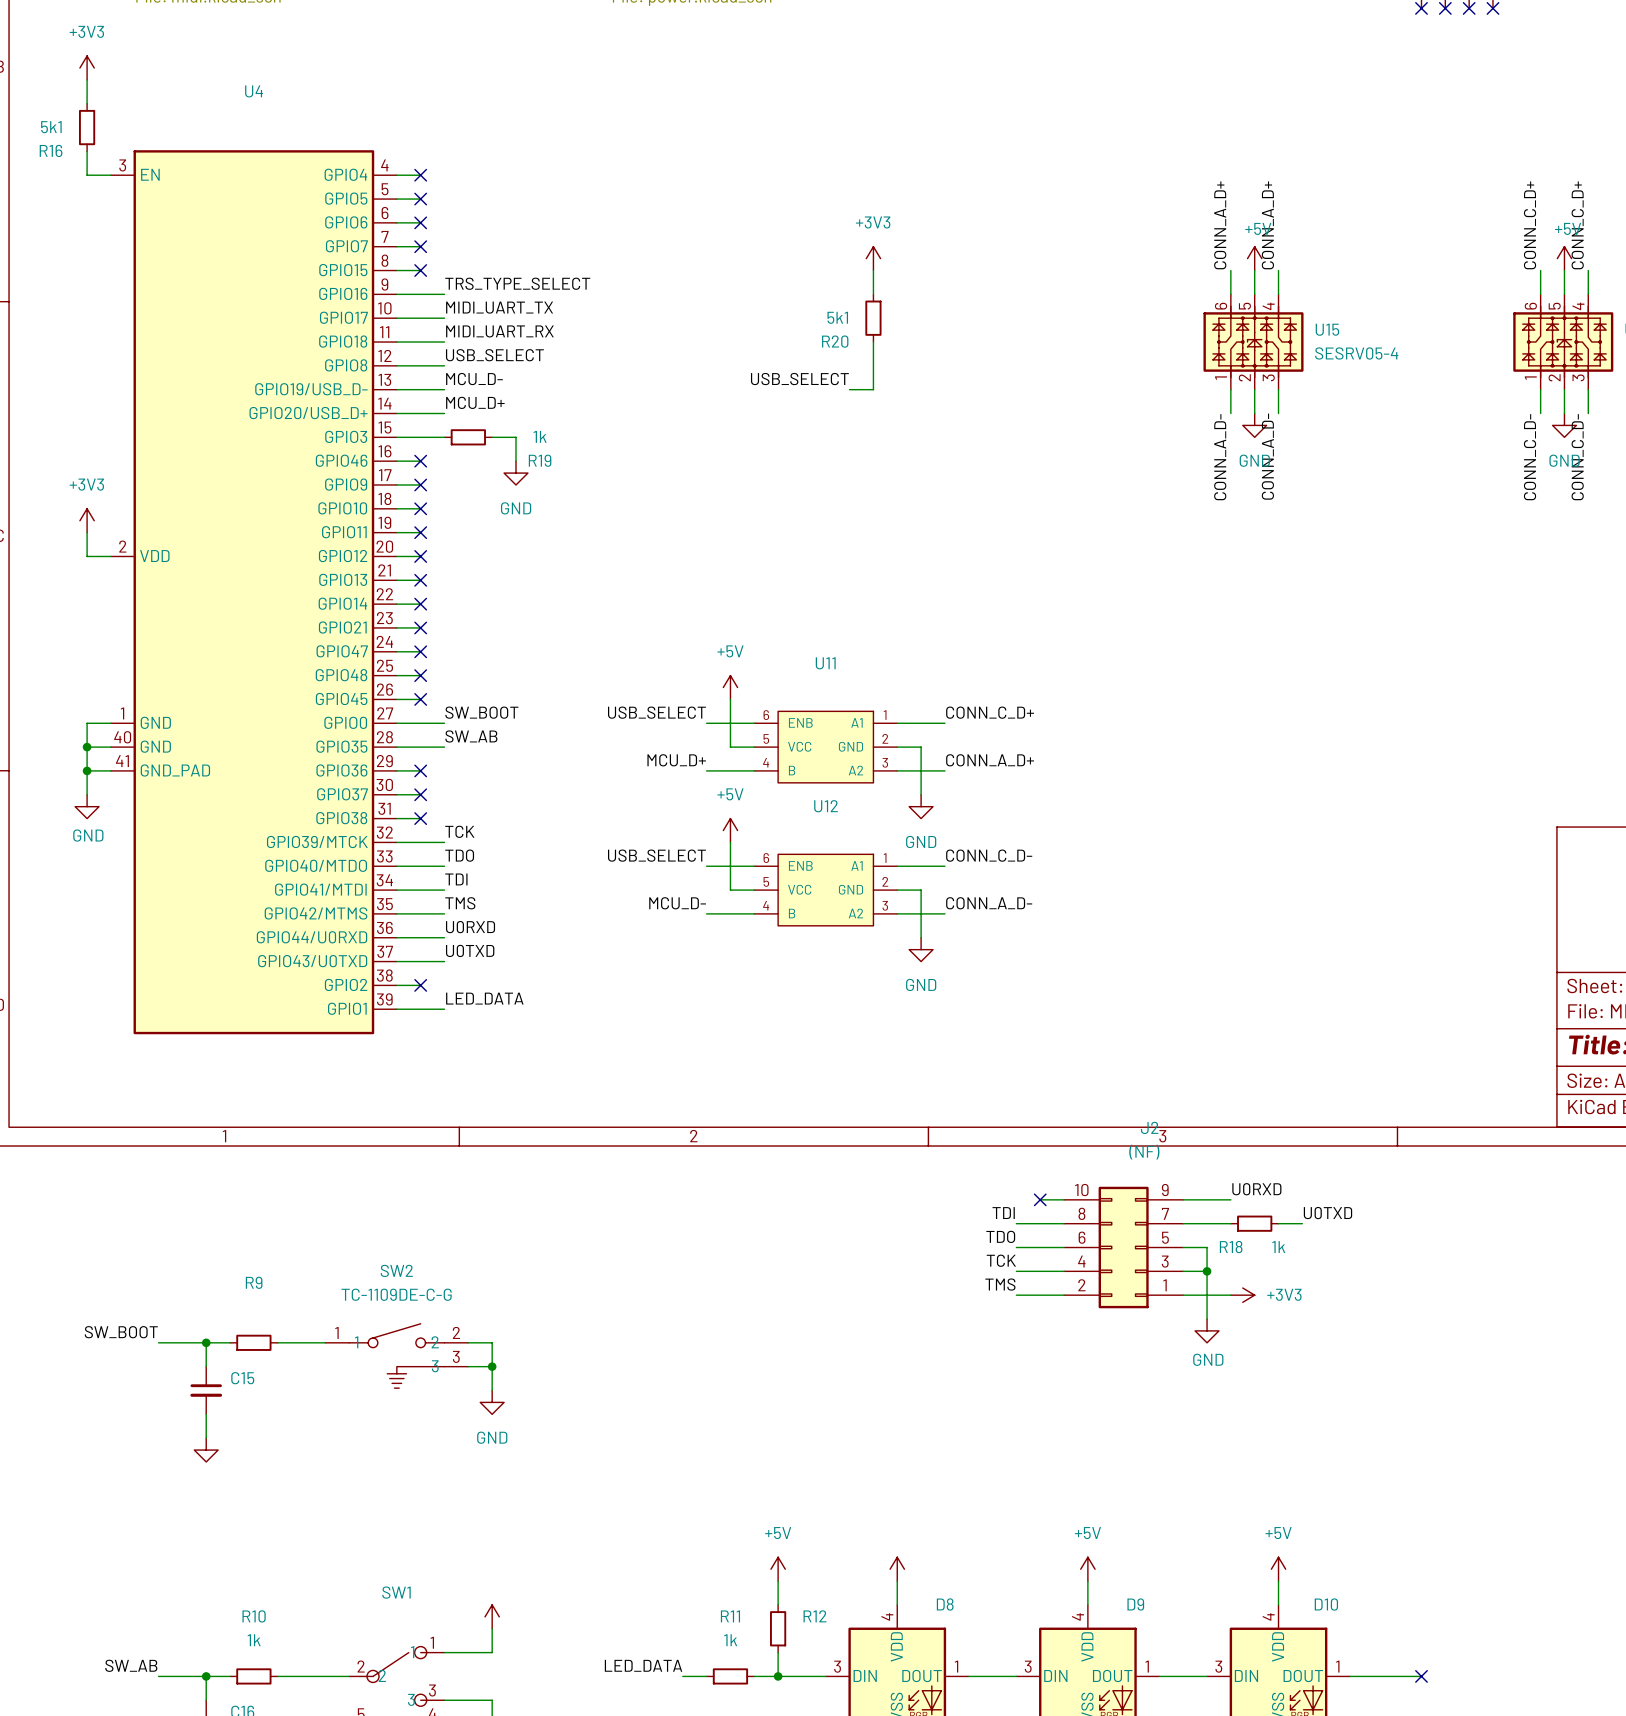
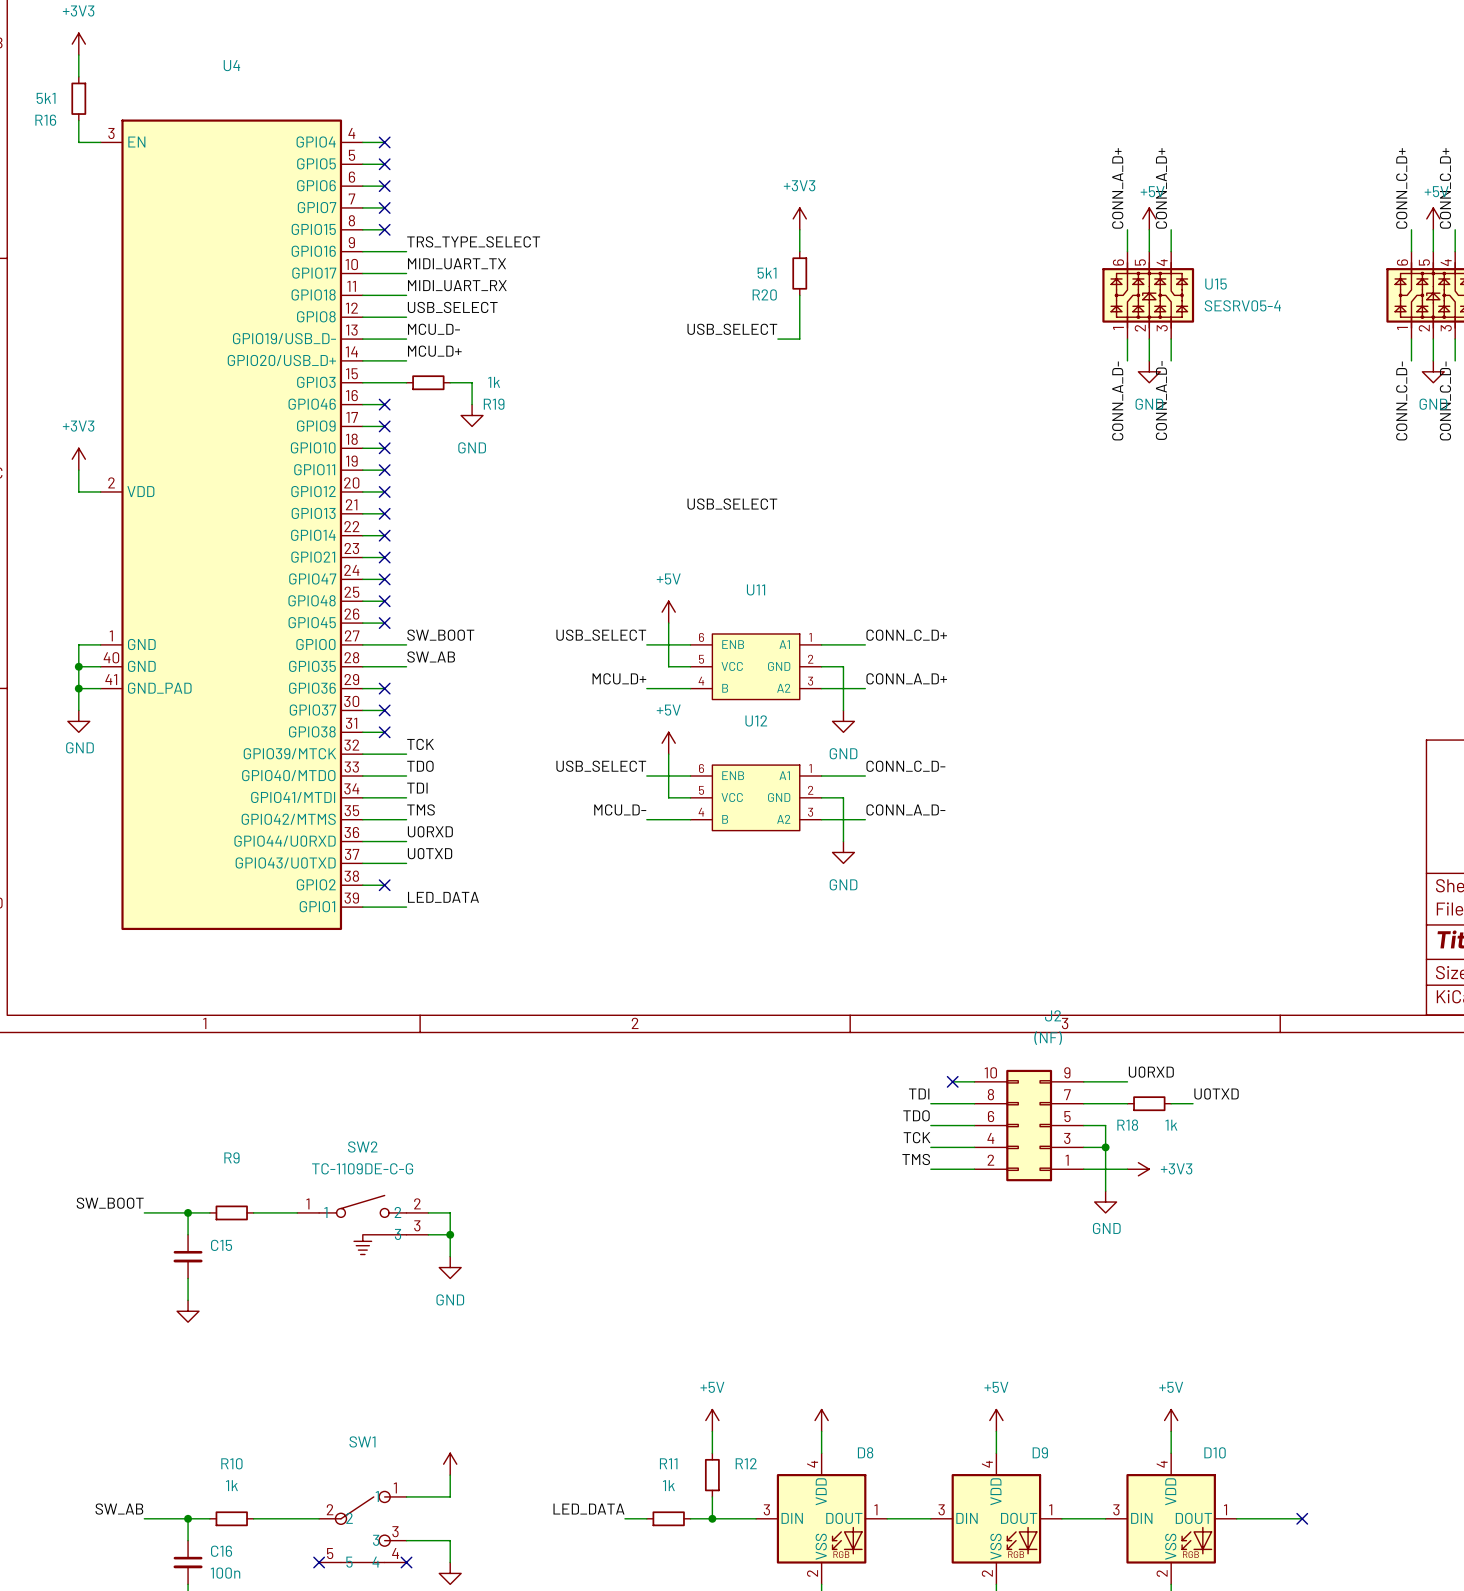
label: none -> USB_SELECT (732, 504)

